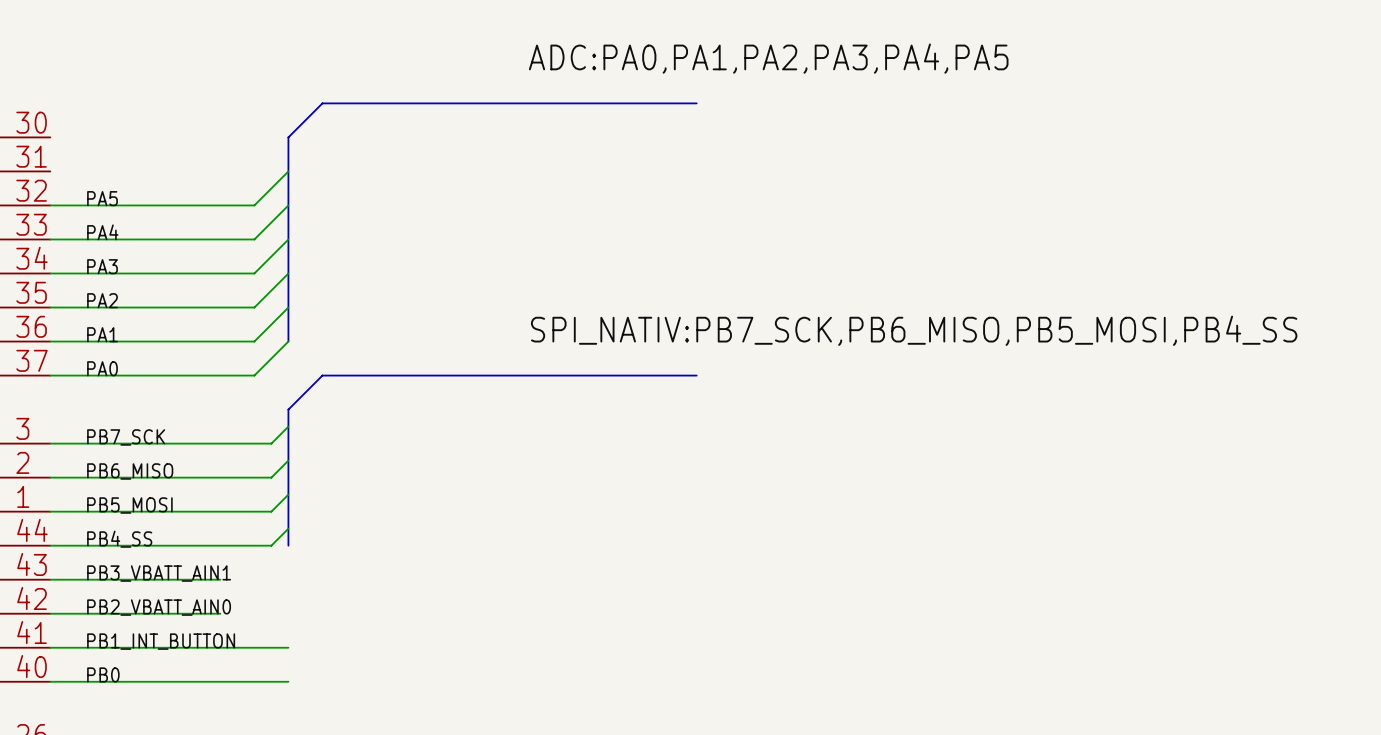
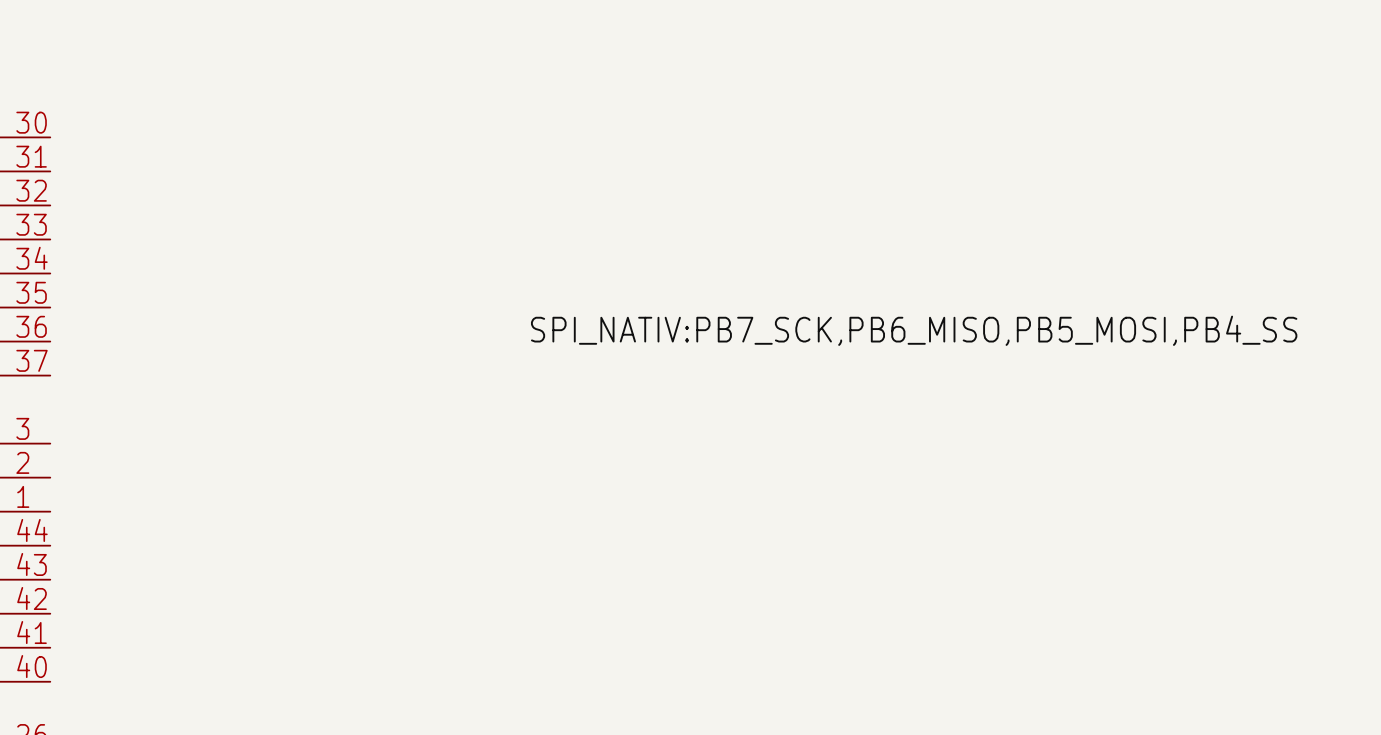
label: ADC:PA0,PA1,PA2,PA3,PA4,PA5 (768, 58) -> none
bus: (696, 103) (322, 103) (288, 137) (288, 341) -> none
wire: (288, 171) (254, 205) (50, 205) -> none
label: PA5 (102, 198) -> none
wire: (288, 205) (254, 239) (50, 239) -> none
label: PA4 (102, 232) -> none
wire: (288, 239) (254, 273) (50, 273) -> none
label: PA3 (102, 266) -> none
wire: (288, 273) (254, 307) (50, 307) -> none
label: PA2 (102, 300) -> none
wire: (288, 307) (254, 341) (50, 341) -> none
label: PA1 (102, 334) -> none
wire: (288, 341) (254, 375) (50, 375) -> none
label: PA0 (102, 368) -> none
bus: (696, 375) (322, 375) (288, 409) (288, 545) -> none
wire: (288, 426) (271, 443) (50, 443) -> none
label: PB7_SCK (126, 437) -> none
wire: (288, 460) (271, 477) (50, 477) -> none
label: PB6_MISO (130, 471) -> none
wire: (288, 494) (271, 511) (50, 511) -> none
label: PB5_MOSI (129, 505) -> none
wire: (288, 528) (271, 545) (50, 545) -> none
label: PB4_SS (119, 539) -> none
label: PB3_VBATT_AIN1 (159, 573) -> none
wire: (50, 579) (220, 579) -> none
label: PB2_VBATT_AIN0 (159, 607) -> none
wire: (50, 613) (220, 613) -> none
label: PB1_INT_BUTTON (161, 641) -> none
wire: (50, 647) (288, 647) -> none
label: PB0 (103, 674) -> none
wire: (50, 681) (288, 681) -> none

